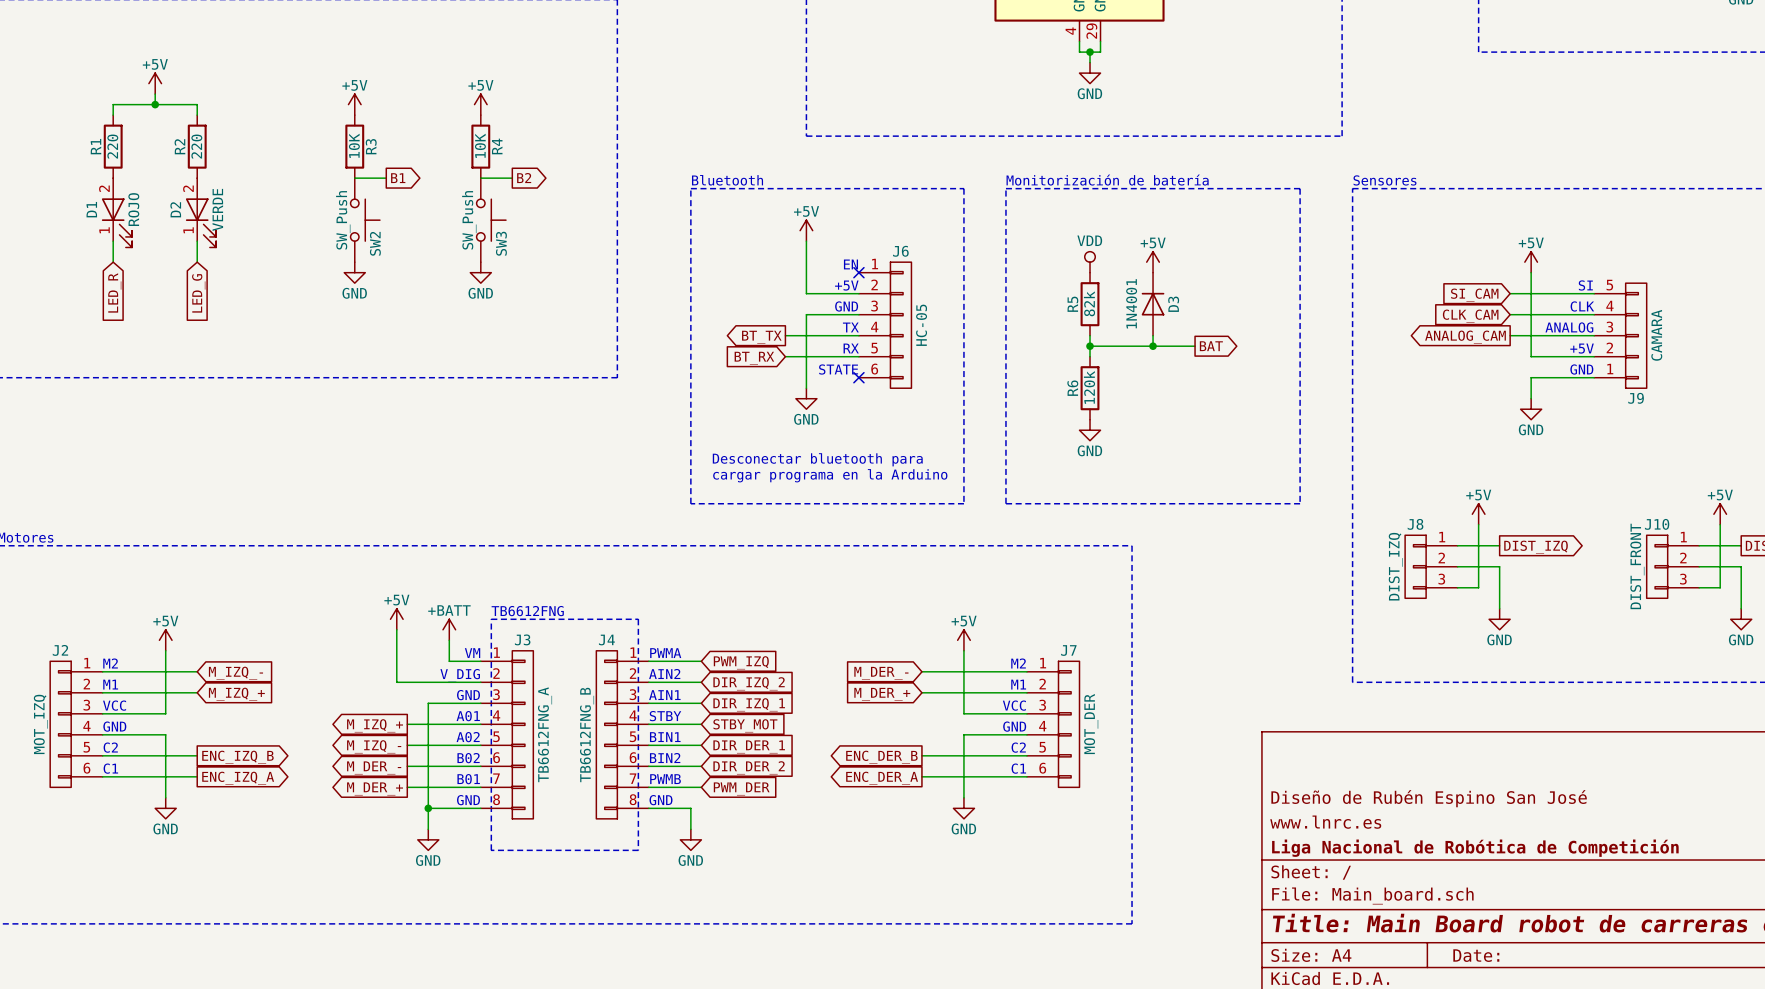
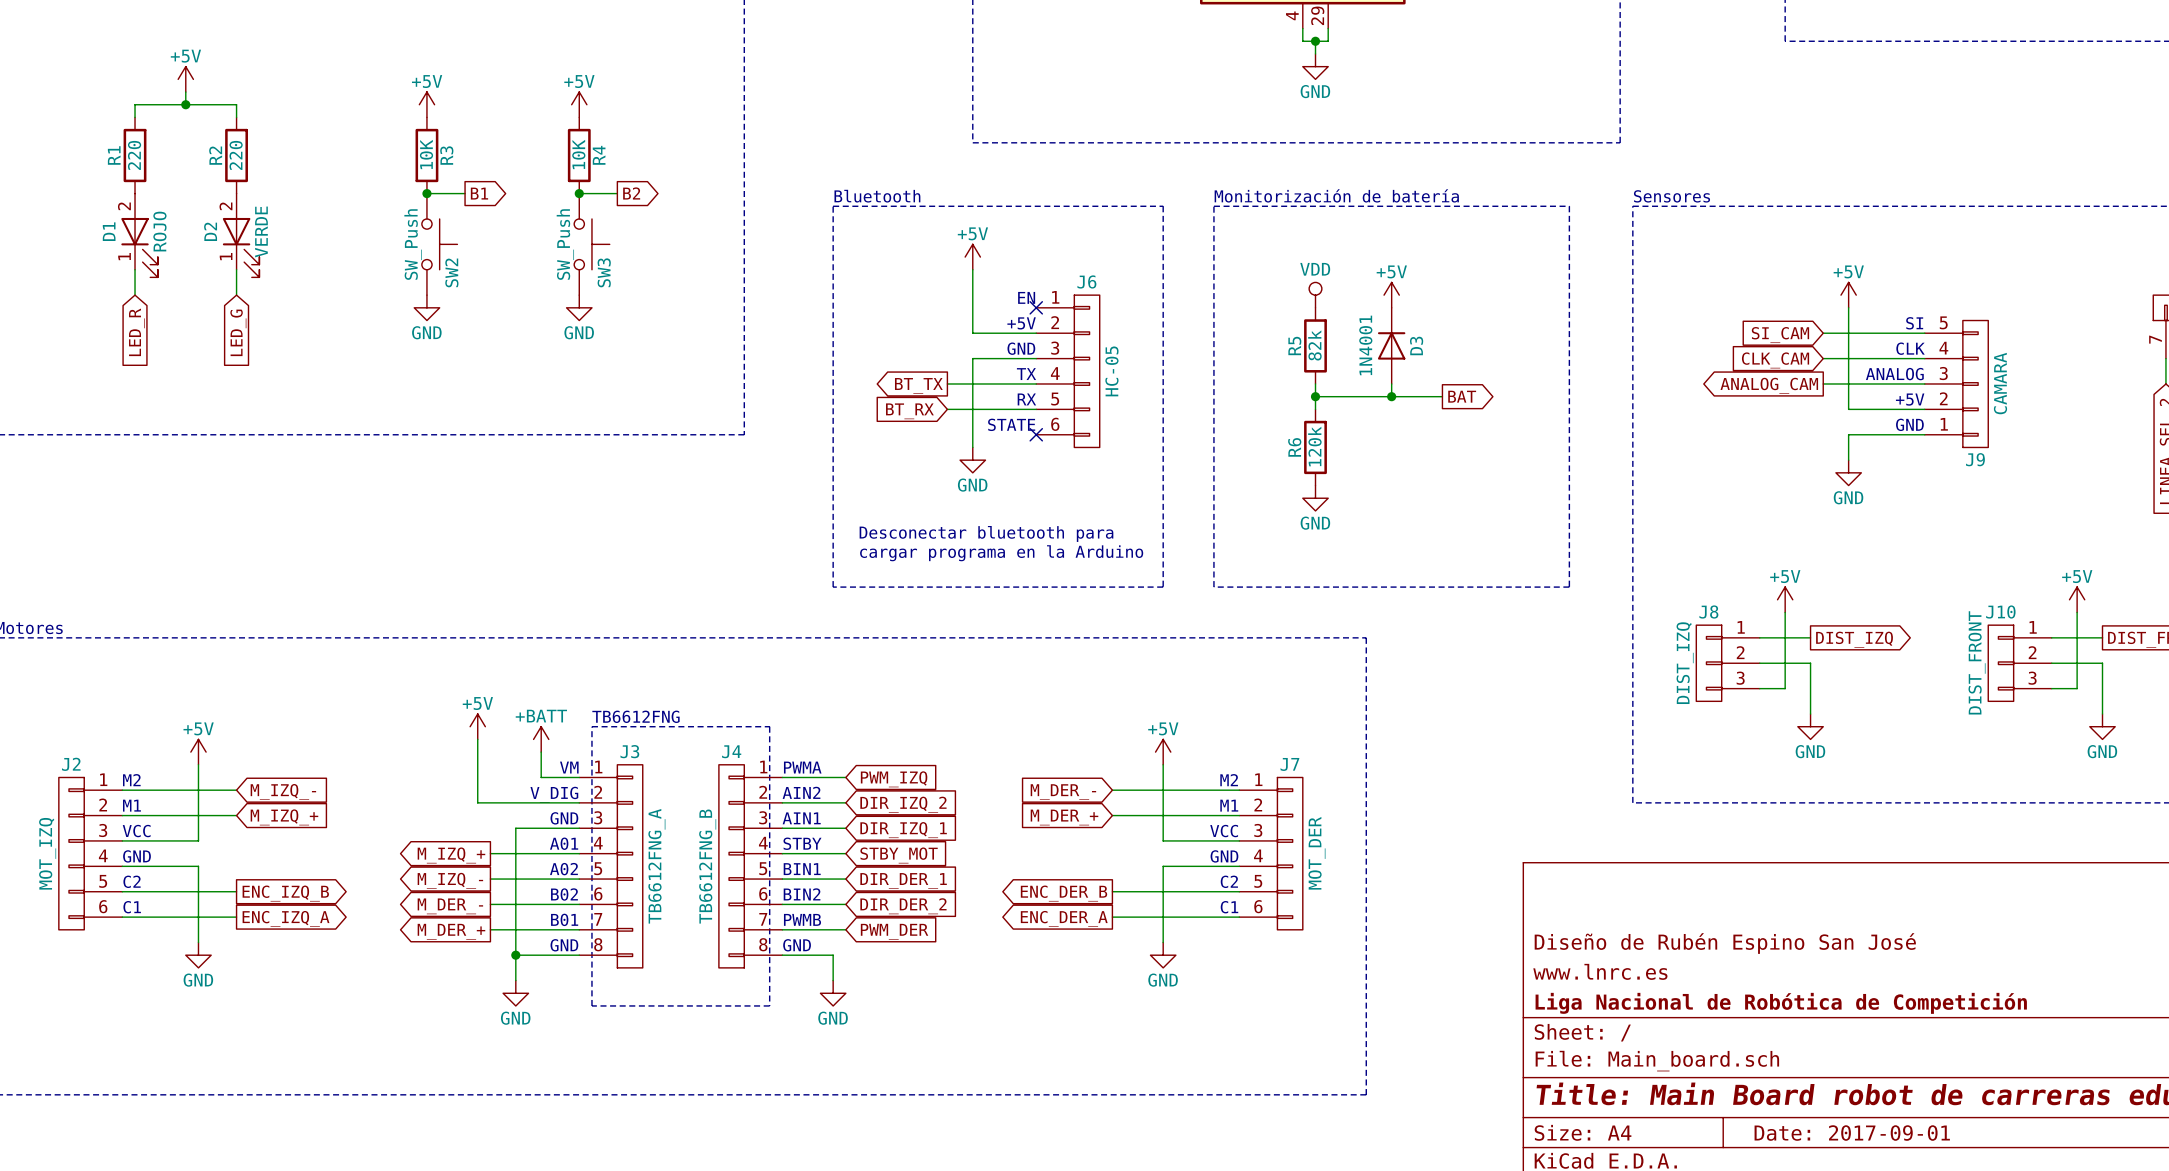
junction: none -> (426, 193)
junction: none -> (579, 193)
title block: Date: (1476, 955) -> Date: 2017-09-01 (1852, 1133)

